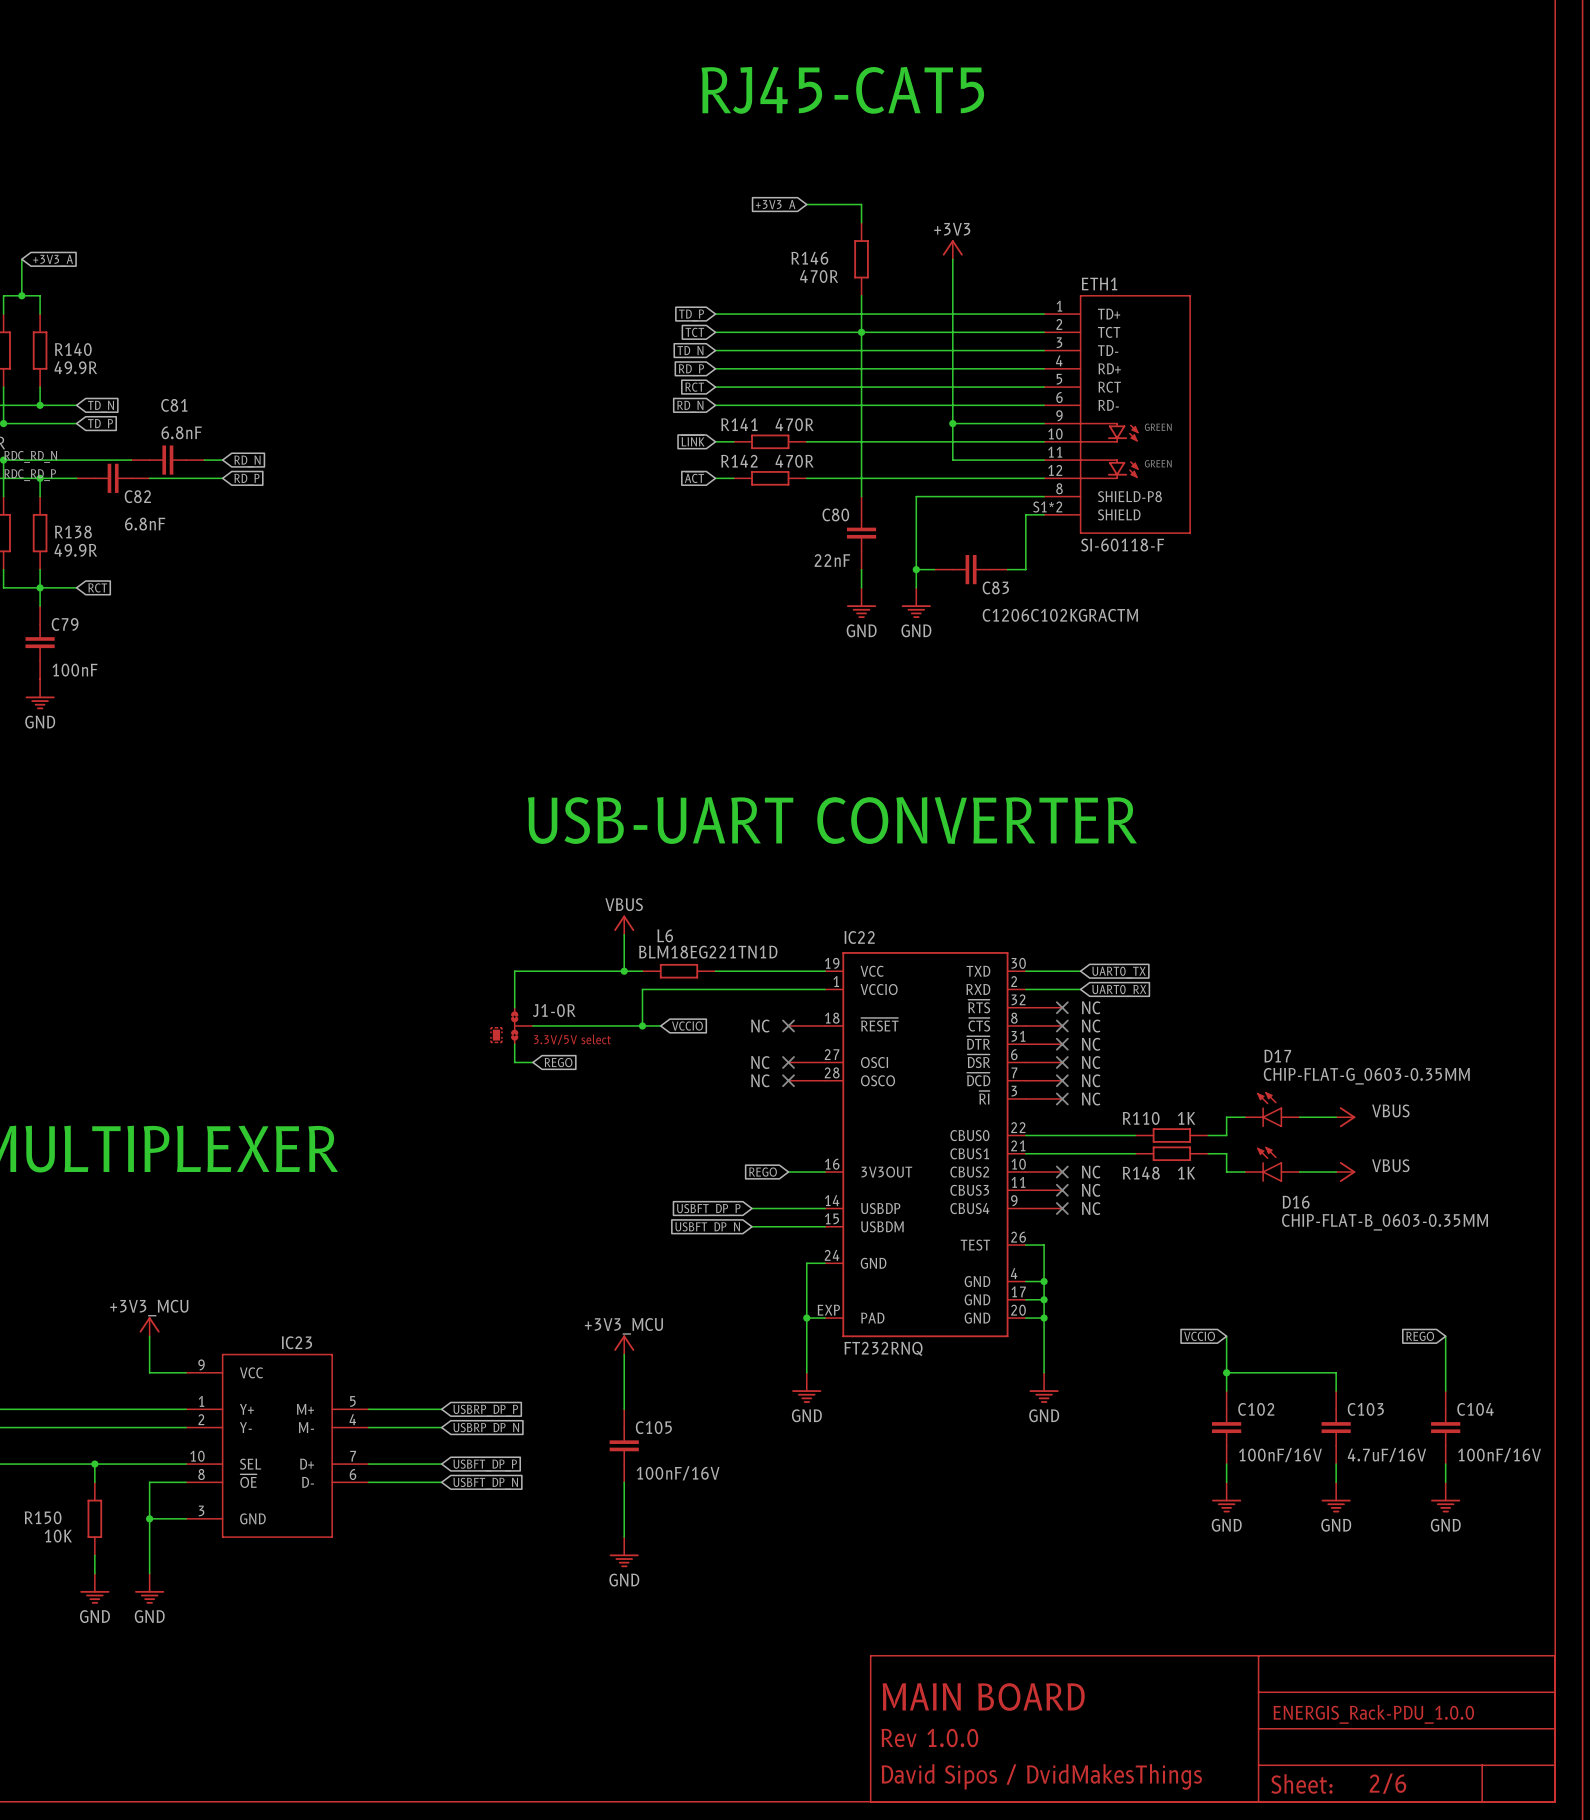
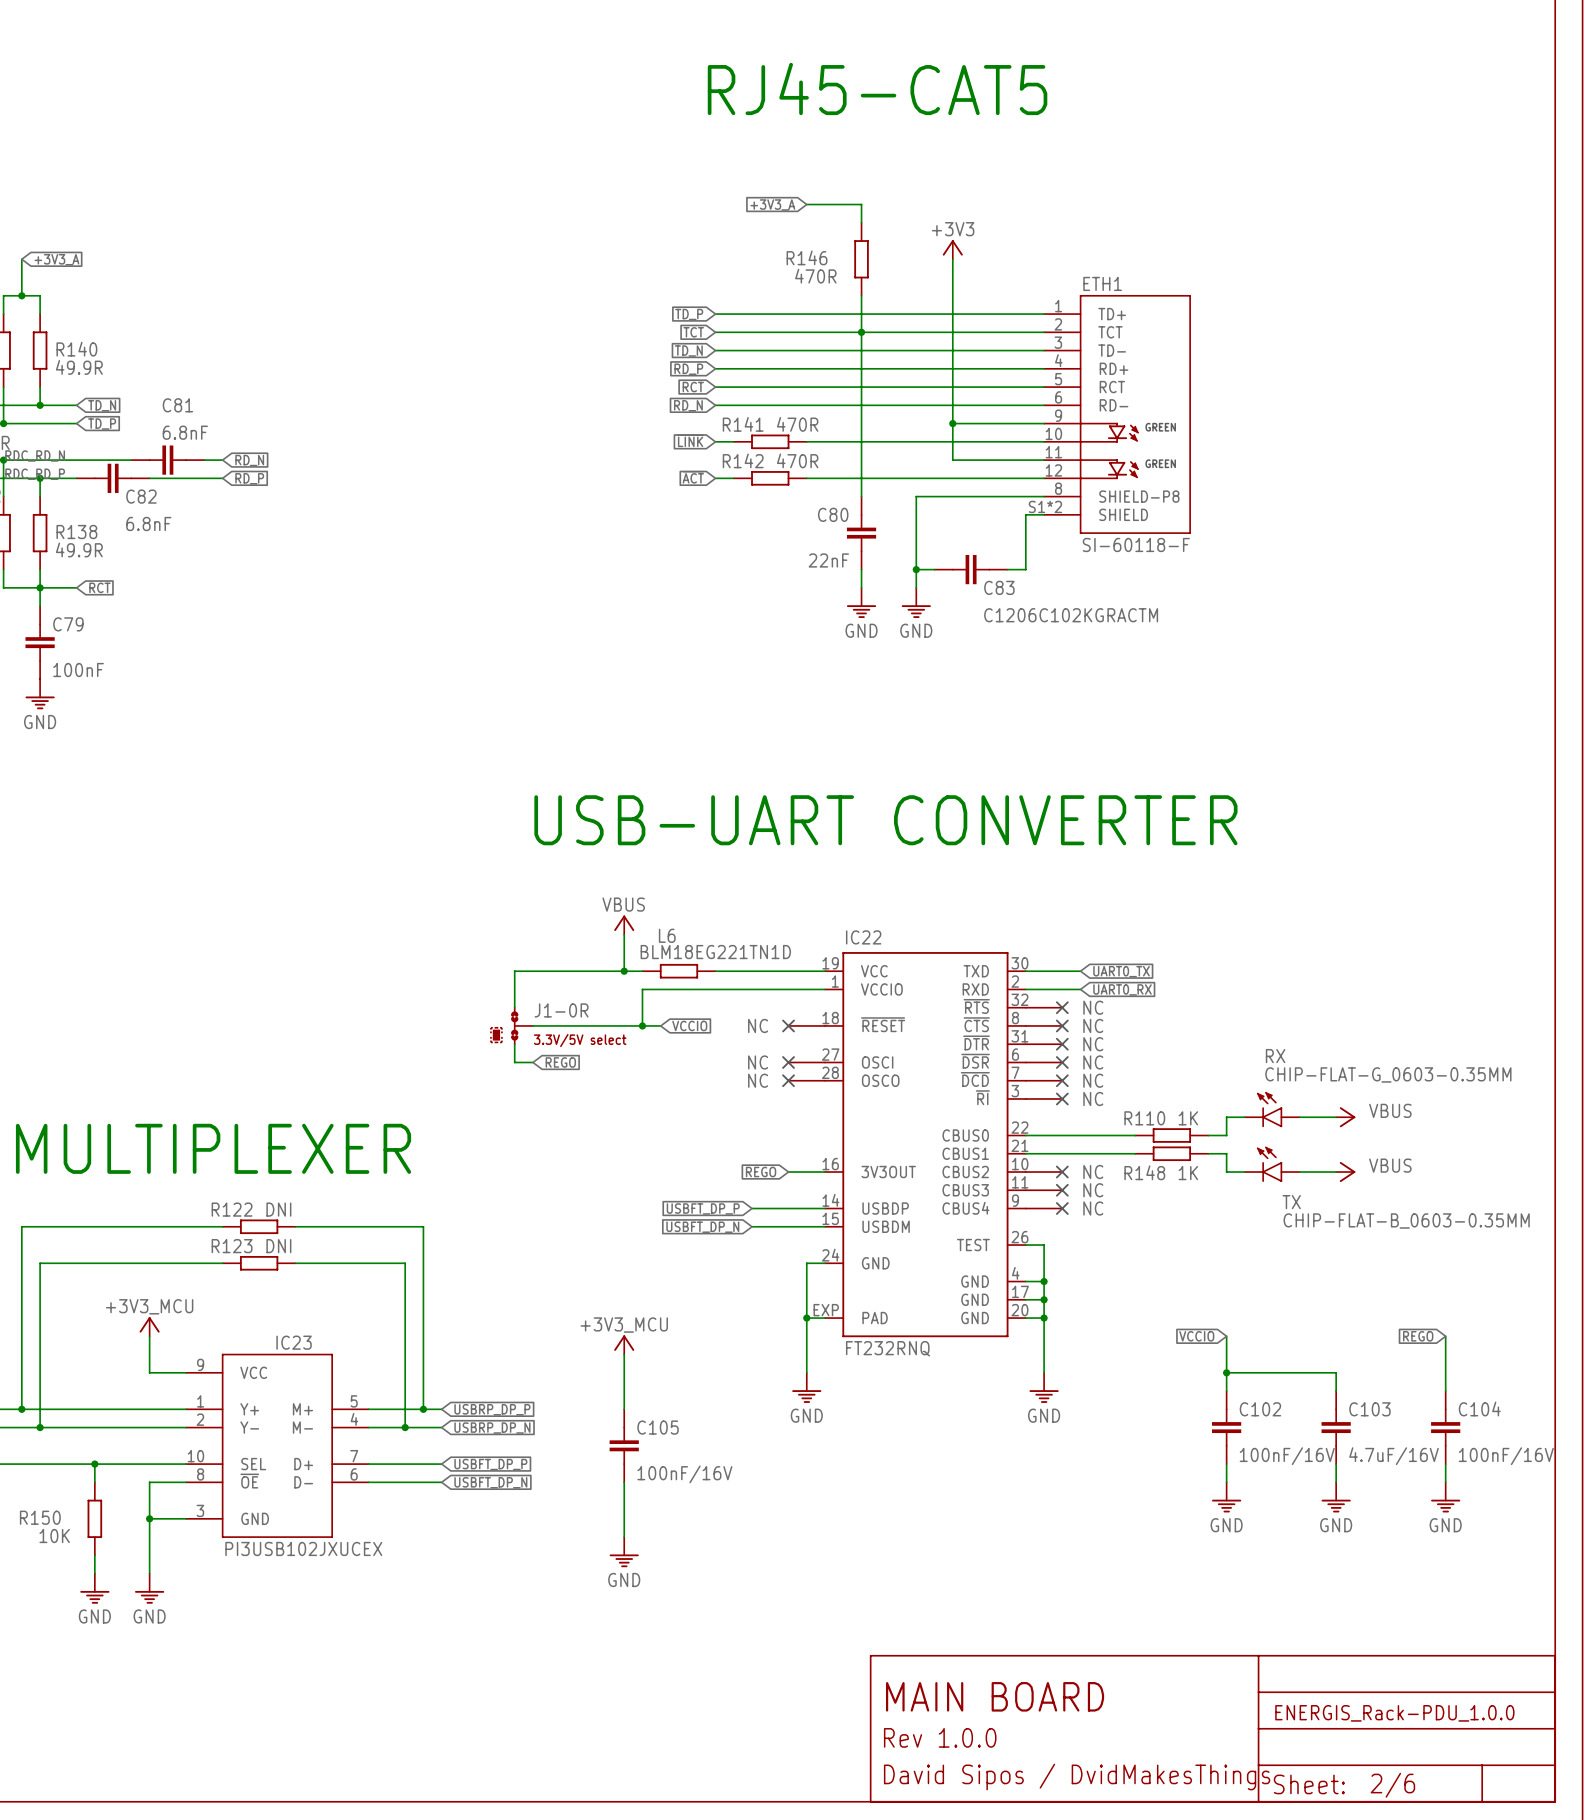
D17 name: D17 (1277, 1056) -> RX (1275, 1056)
D16 name: D16 (1296, 1202) -> TX (1291, 1202)
wire: none -> (222, 1226) (21, 1226) (21, 1409)
R122: none -> DNI (259, 1226)
wire: none -> (295, 1226) (423, 1226) (423, 1409)
wire: none -> (222, 1263) (40, 1263) (40, 1427)
R123: none -> DNI (259, 1263)
wire: none -> (295, 1263) (405, 1263) (405, 1427)
junction: none -> (21, 1409)
junction: none -> (423, 1409)
junction: none -> (40, 1427)
junction: none -> (405, 1427)
IC23 value: none -> PI3USB102JXUCEX (303, 1548)

